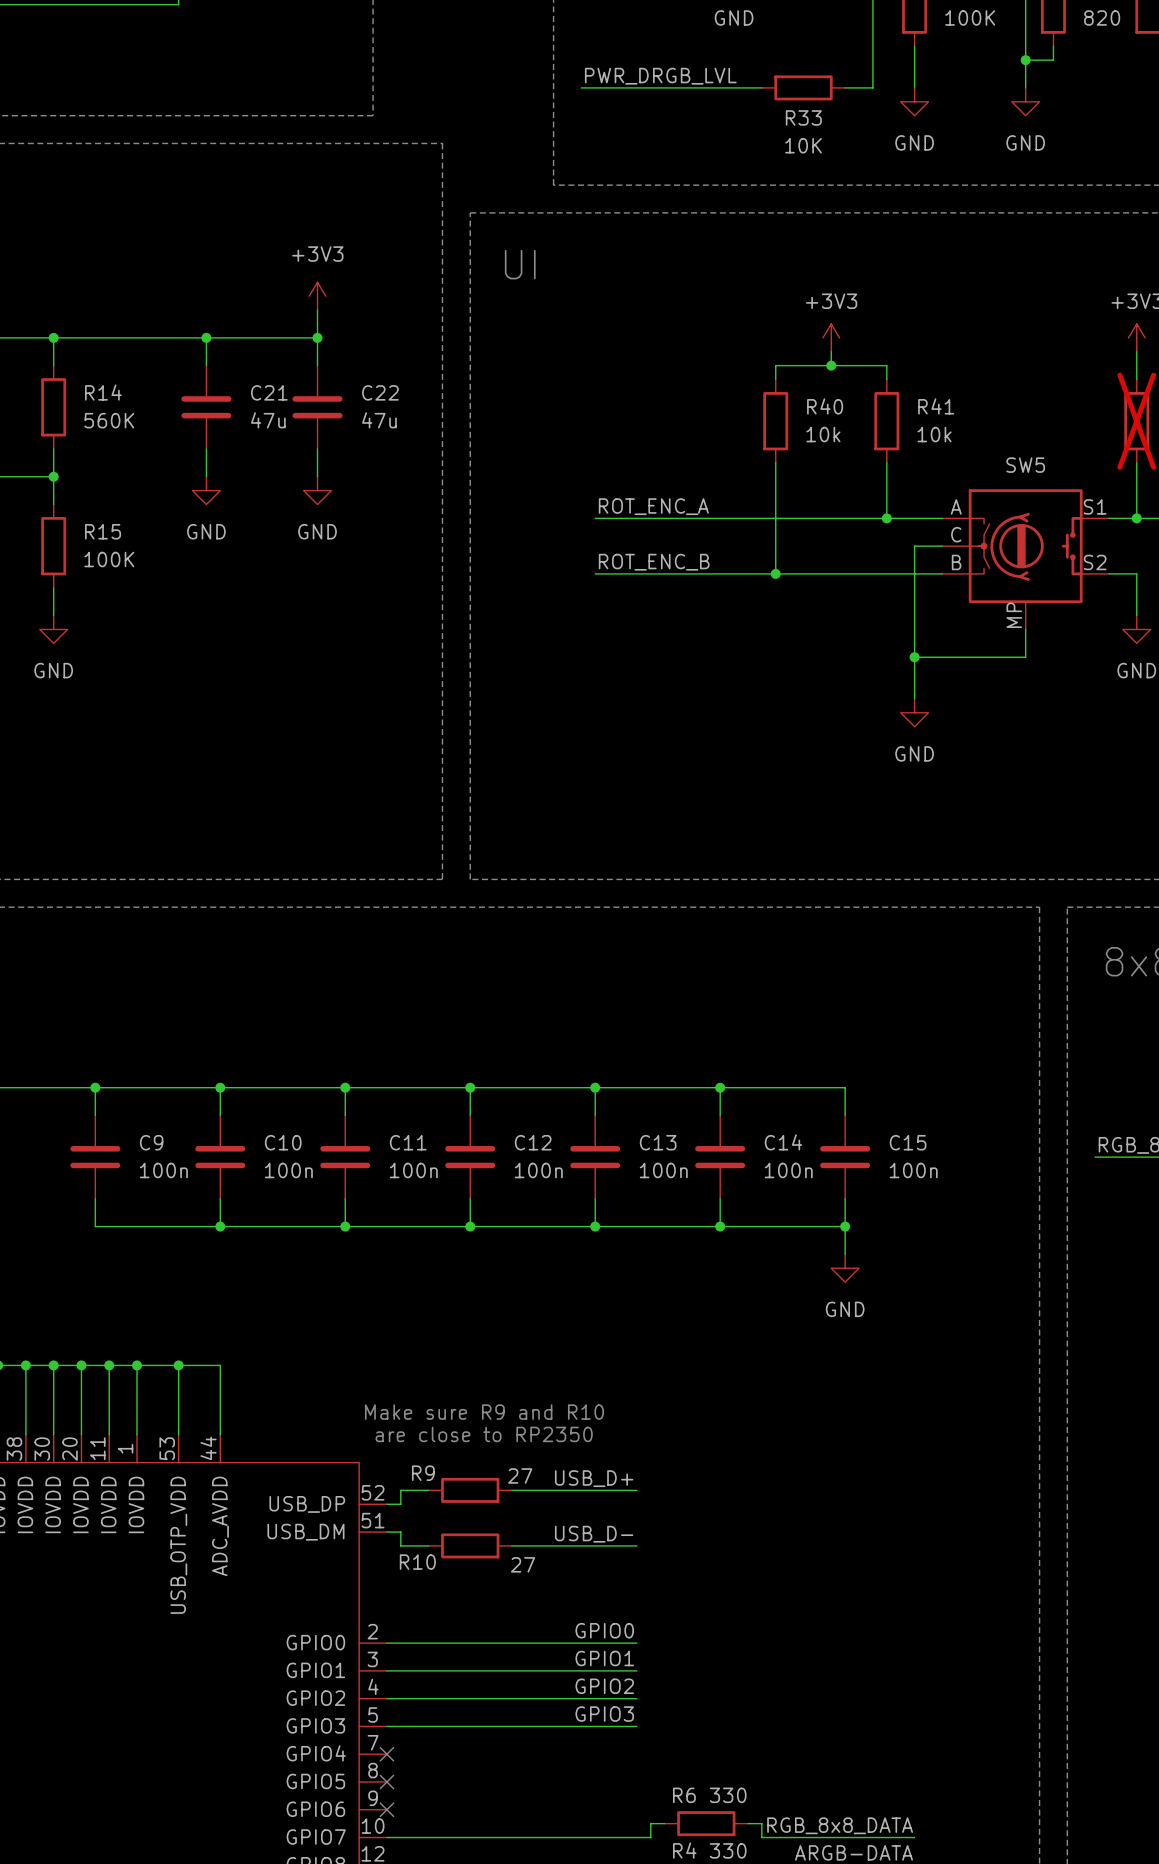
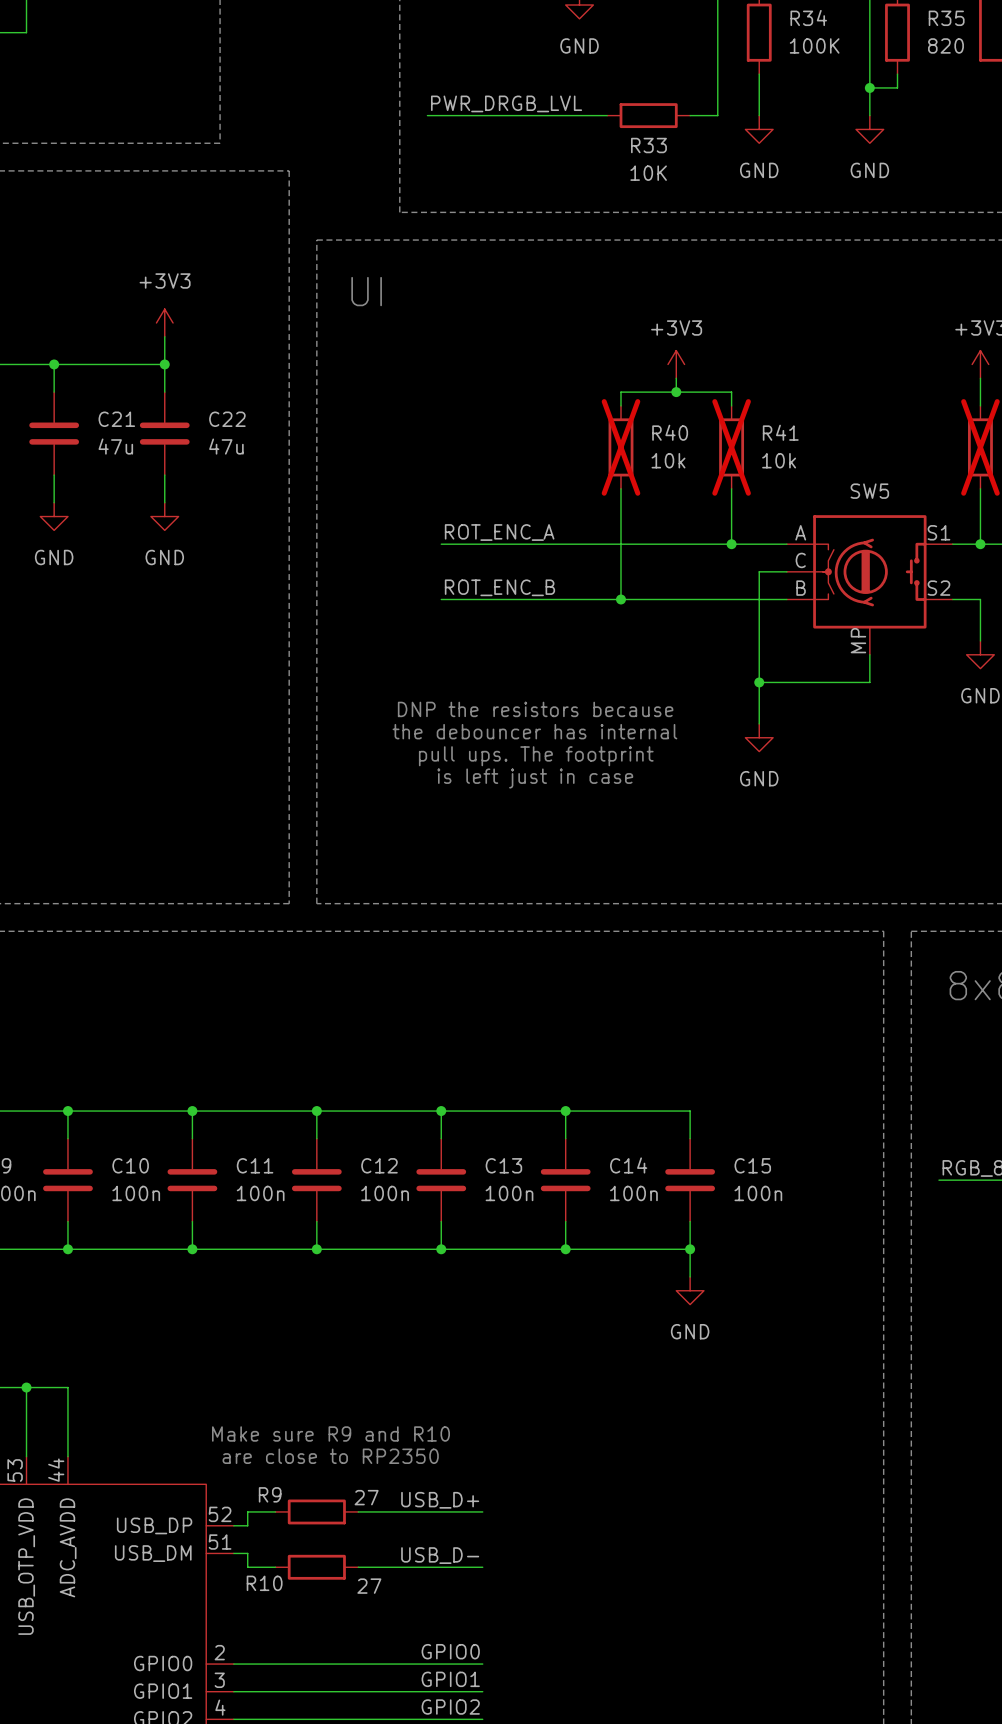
R40 do-not-place cross: none -> (620, 447)
R41 do-not-place cross: none -> (731, 447)
text: none -> DNP the resistors because (535, 709)
text: none -> the debouncer has internal (534, 731)
text: none -> pull ups. The footprint (536, 756)
text: none -> is left just in case (535, 778)

